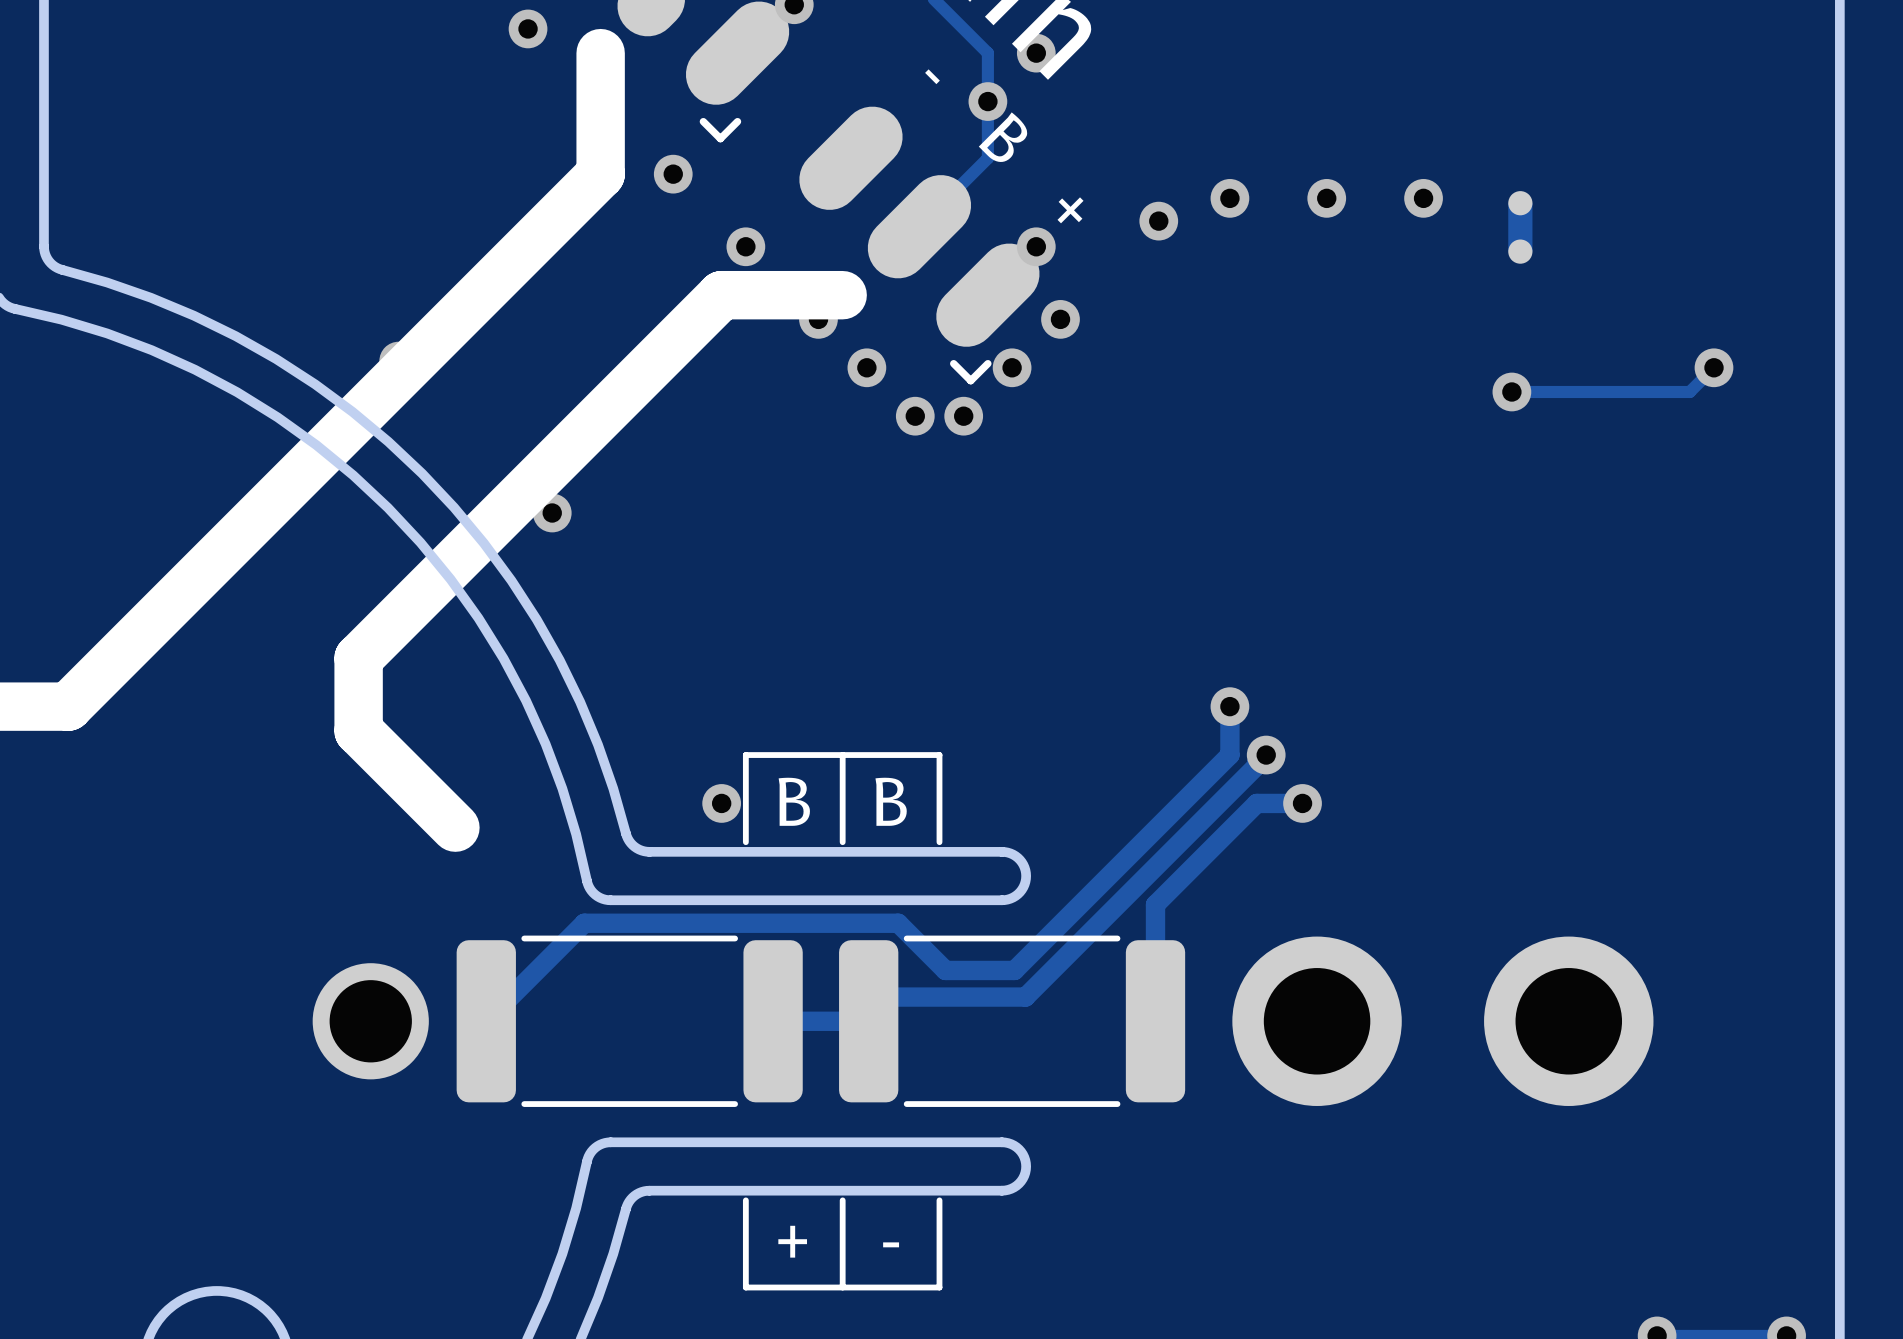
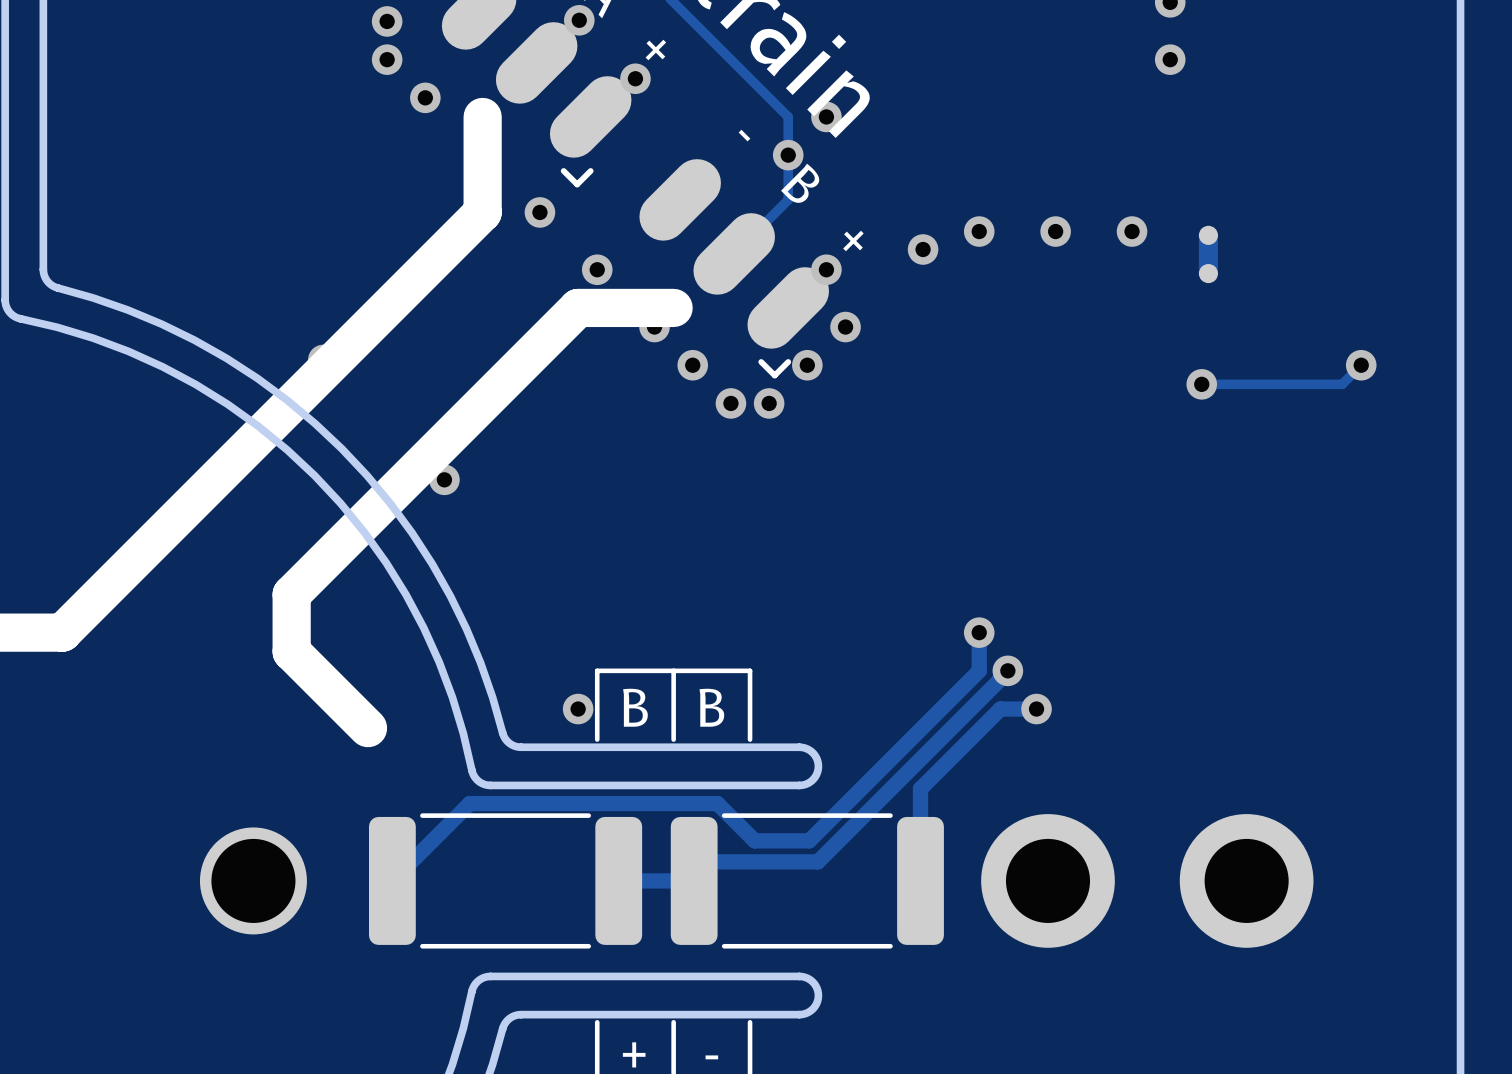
part: none -> (253, 880)
part: (370, 1021) -> none

